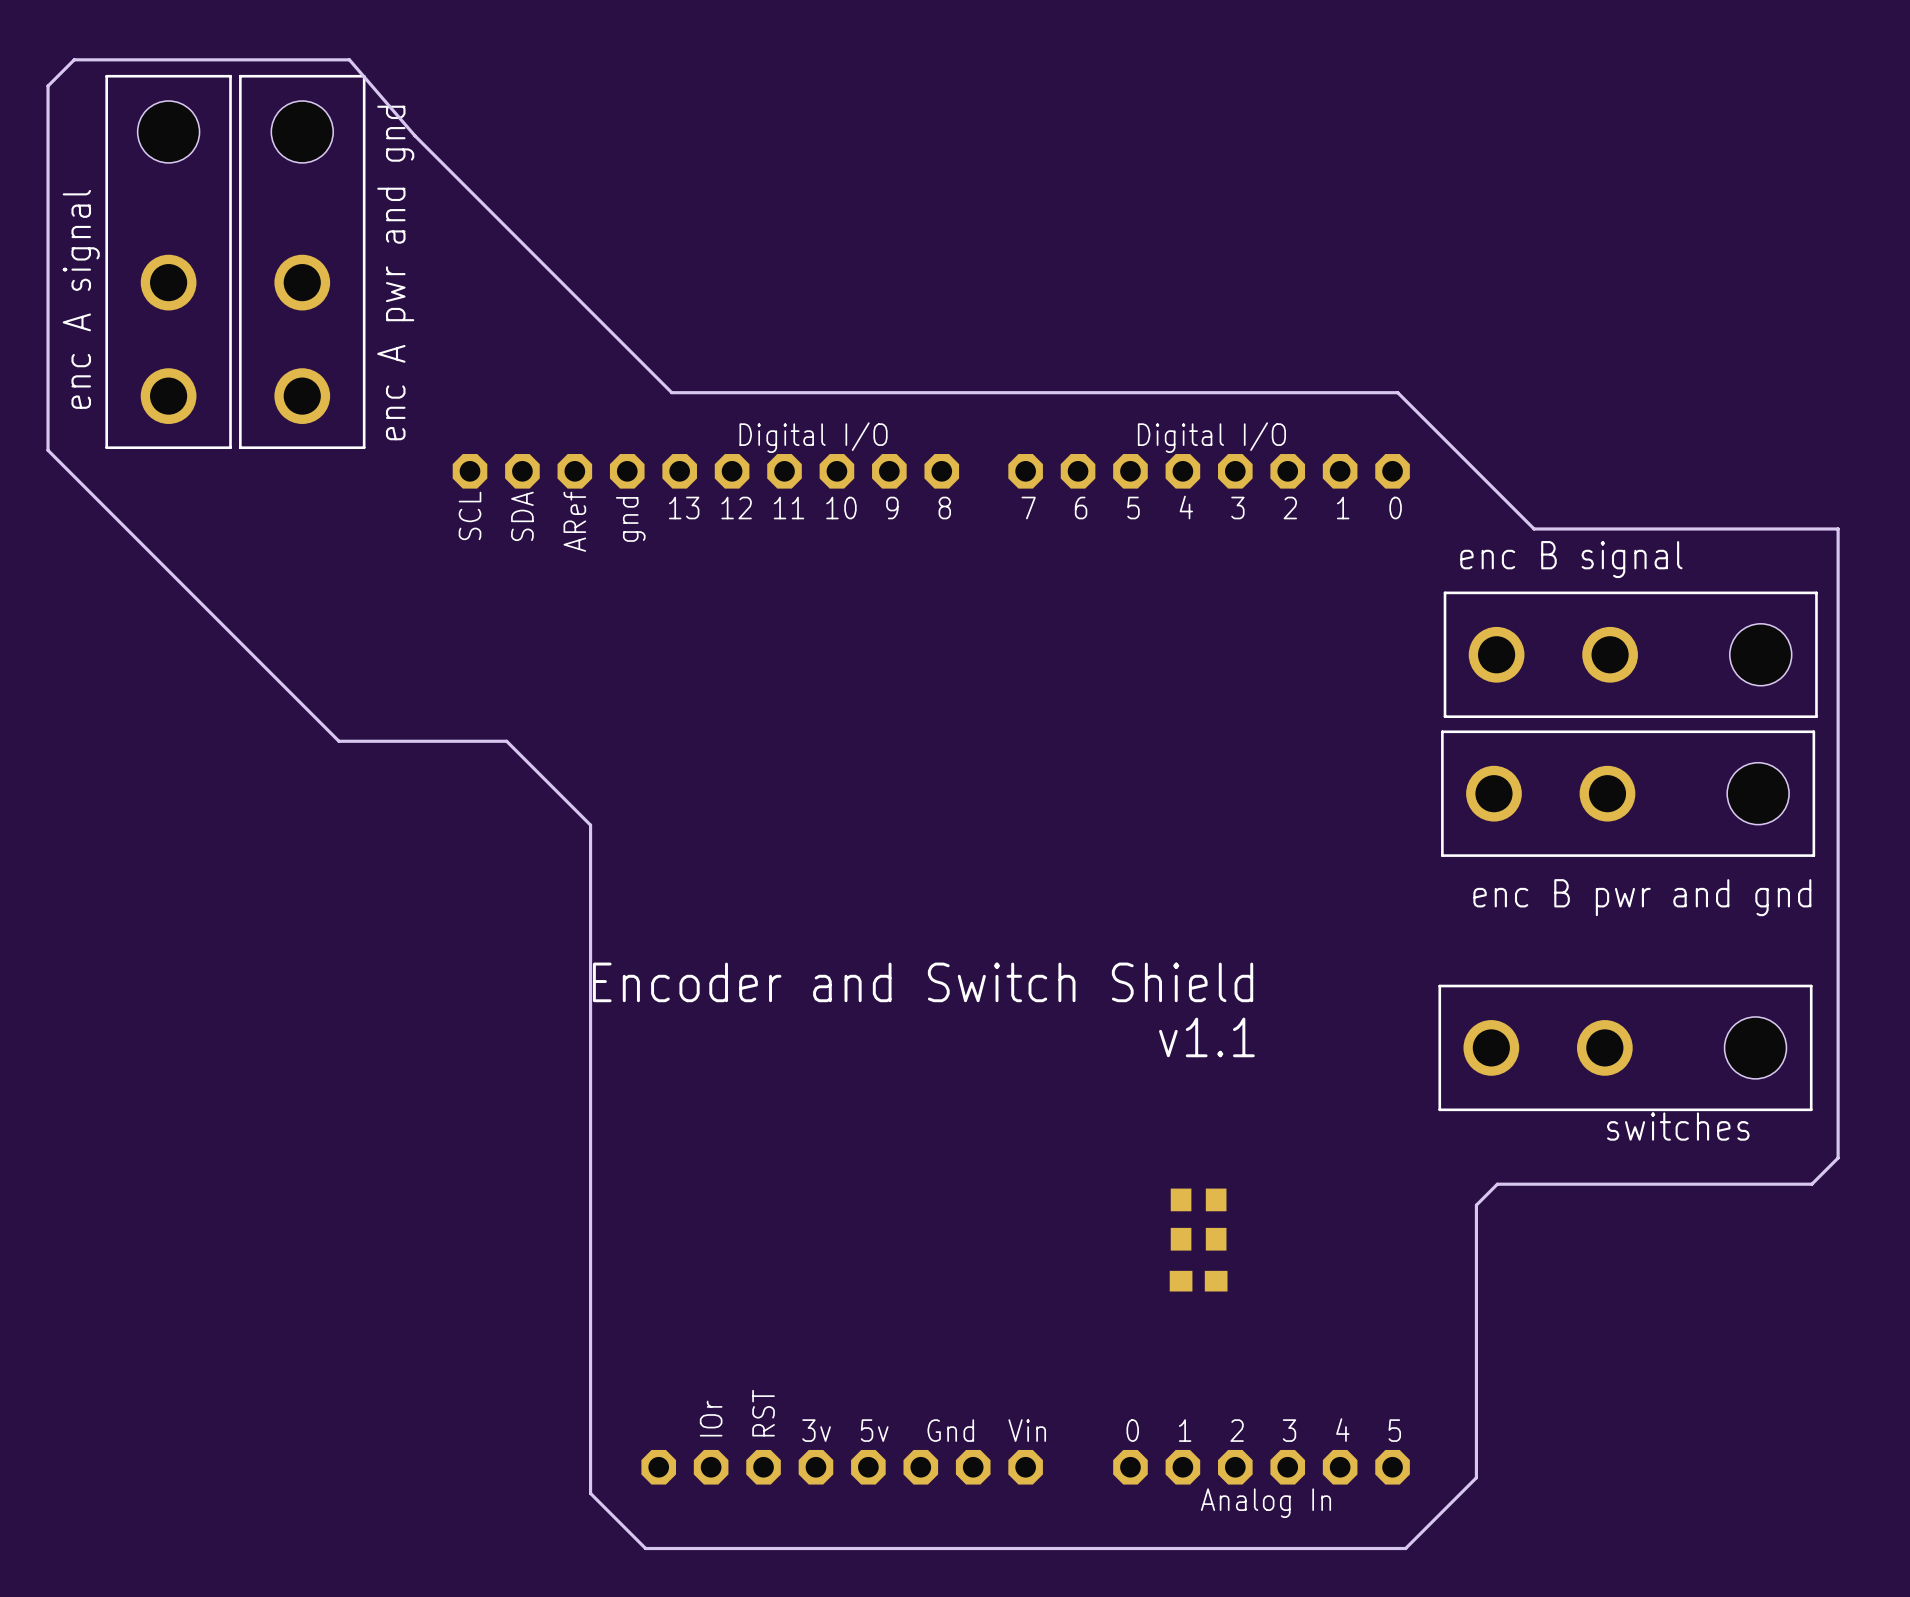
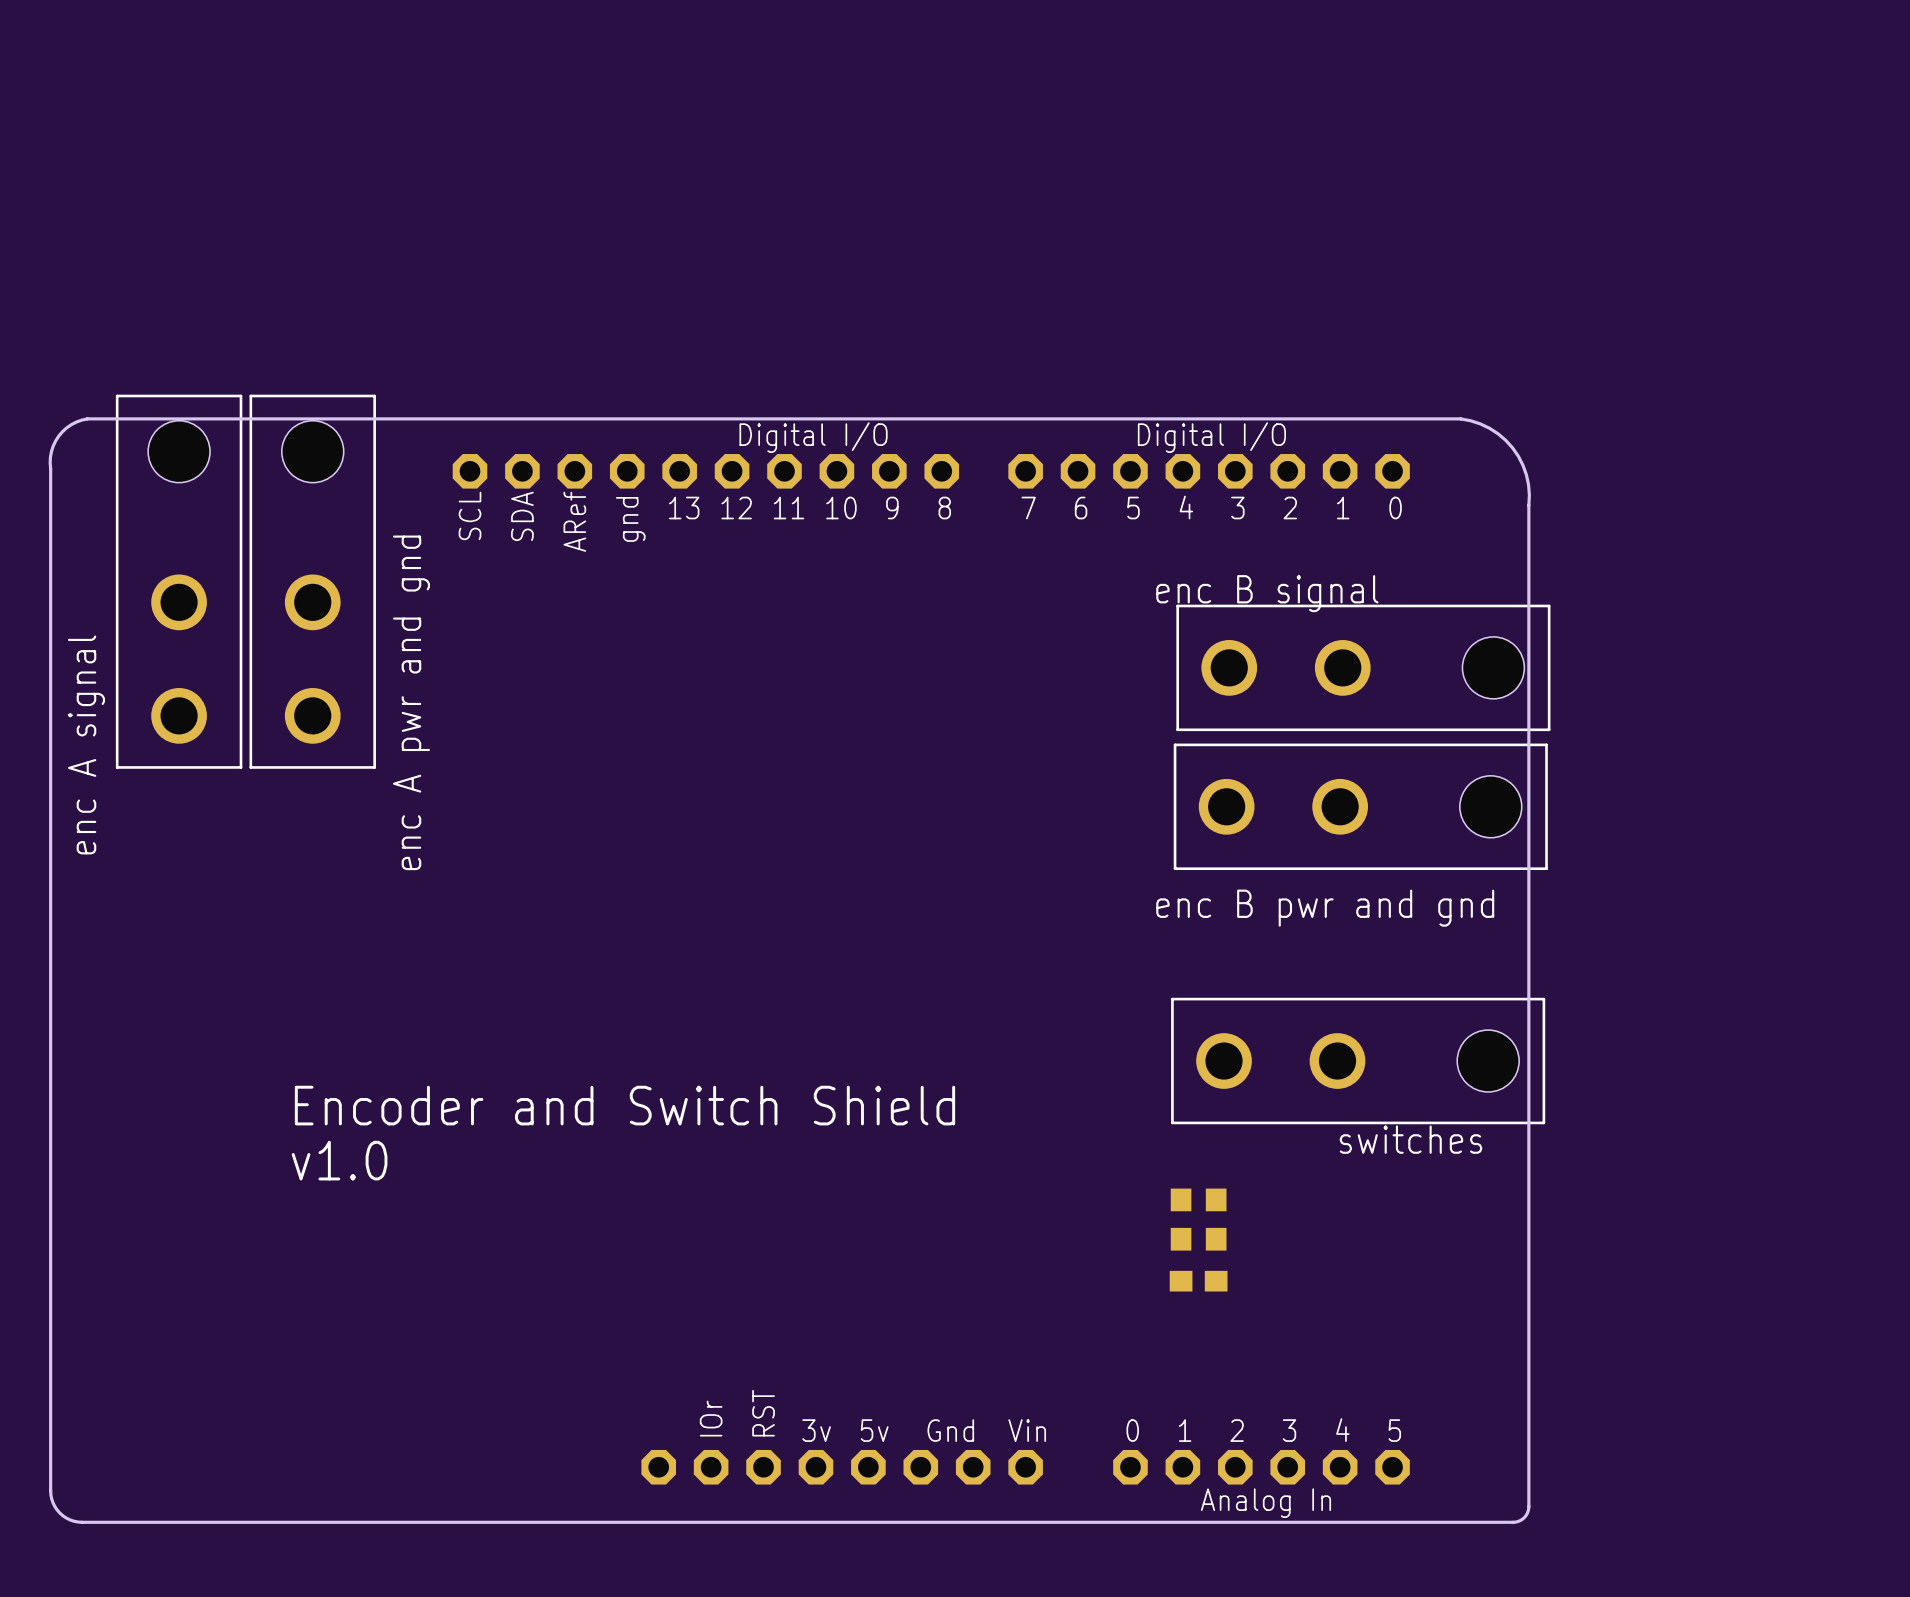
board edge: (74, 59) (349, 59) (414, 135) (671, 392) (1397, 392) (1534, 528) (1838, 528) (1838, 1157) (1811, 1184) (1497, 1184) (1476, 1205) (1476, 1477) (1405, 1548) (645, 1548) (590, 1493) (590, 825) (506, 741) (338, 741) (48, 450) (48, 86) (74, 59) -> (87, 418) (71, 424) (62, 431) (53, 446) (50, 462) (50, 1490) (53, 1502) (62, 1515) (73, 1521) (82, 1522) (1513, 1522) (1519, 1521) (1525, 1516) (1528, 1506) (1529, 495) (1526, 475) (1518, 456) (1498, 433) (1480, 423) (1460, 418) (87, 418)
part: (168, 261) -> none
part: (302, 261) -> none
text position: enc A pwr and gnd (395, 272) -> enc A pwr and gnd (411, 702)
text position: enc A signal (81, 299) -> enc A signal (86, 744)
text position: enc B signal (1571, 559) -> enc B signal (1267, 593)
part: none -> (179, 581)
part: none -> (312, 581)
part: (1630, 654) -> none
part: none -> (1363, 667)
part: (1628, 793) -> none
part: none -> (1360, 806)
text position: enc B pwr and gnd (1642, 897) -> enc B pwr and gnd (1325, 908)
text: Encoder and Switch Shield (923, 982) -> none
text: v1.1 (1206, 1037) -> none
part: (1625, 1047) -> none
part: none -> (1358, 1061)
text: none -> Encoder and Switch Shield (624, 1105)
text position: switches (1678, 1126) -> switches (1410, 1139)
text: none -> v1.0 (339, 1160)

